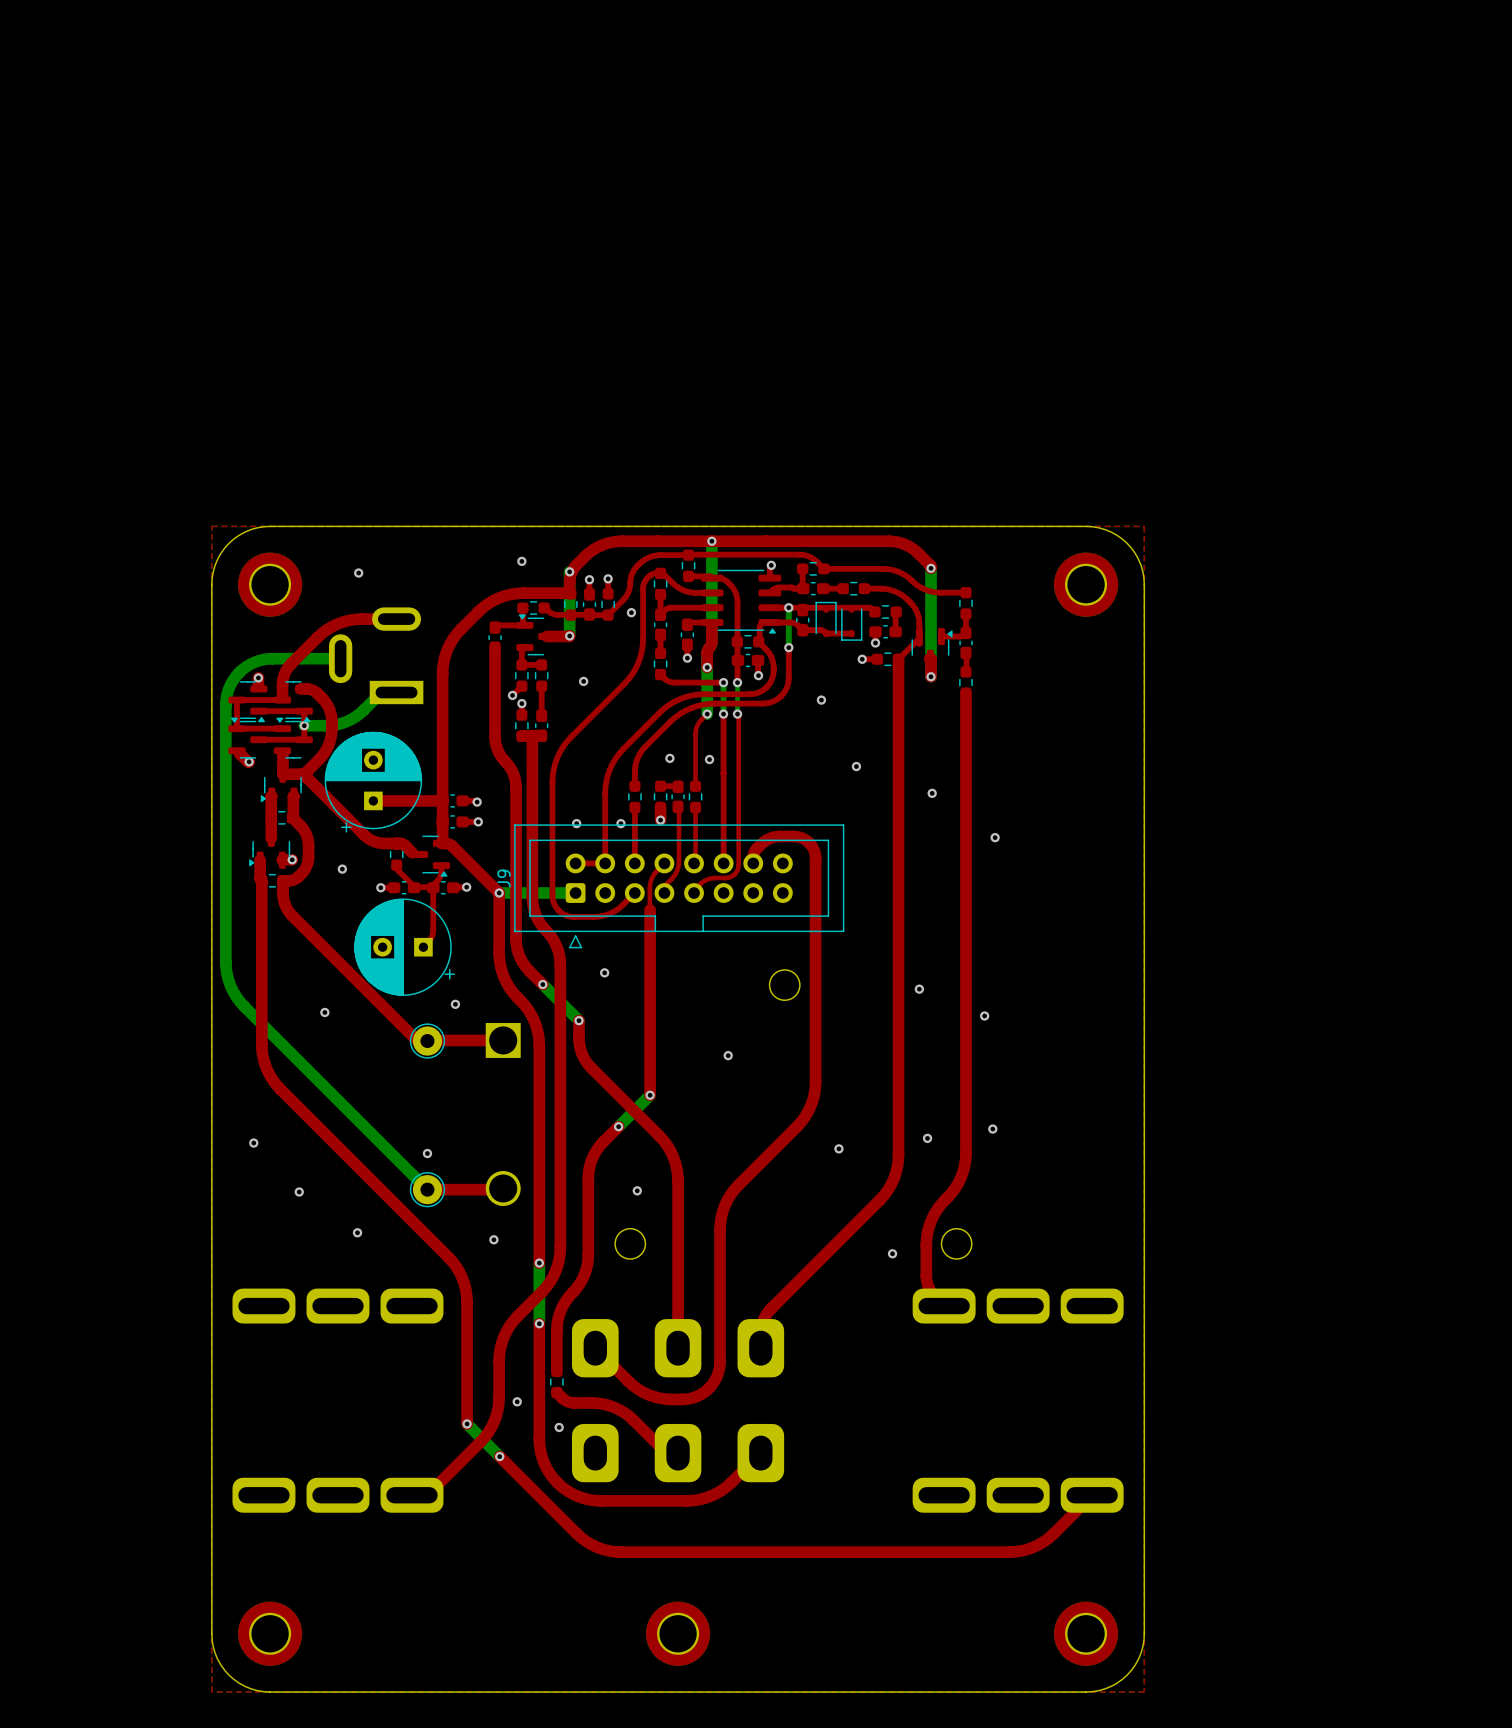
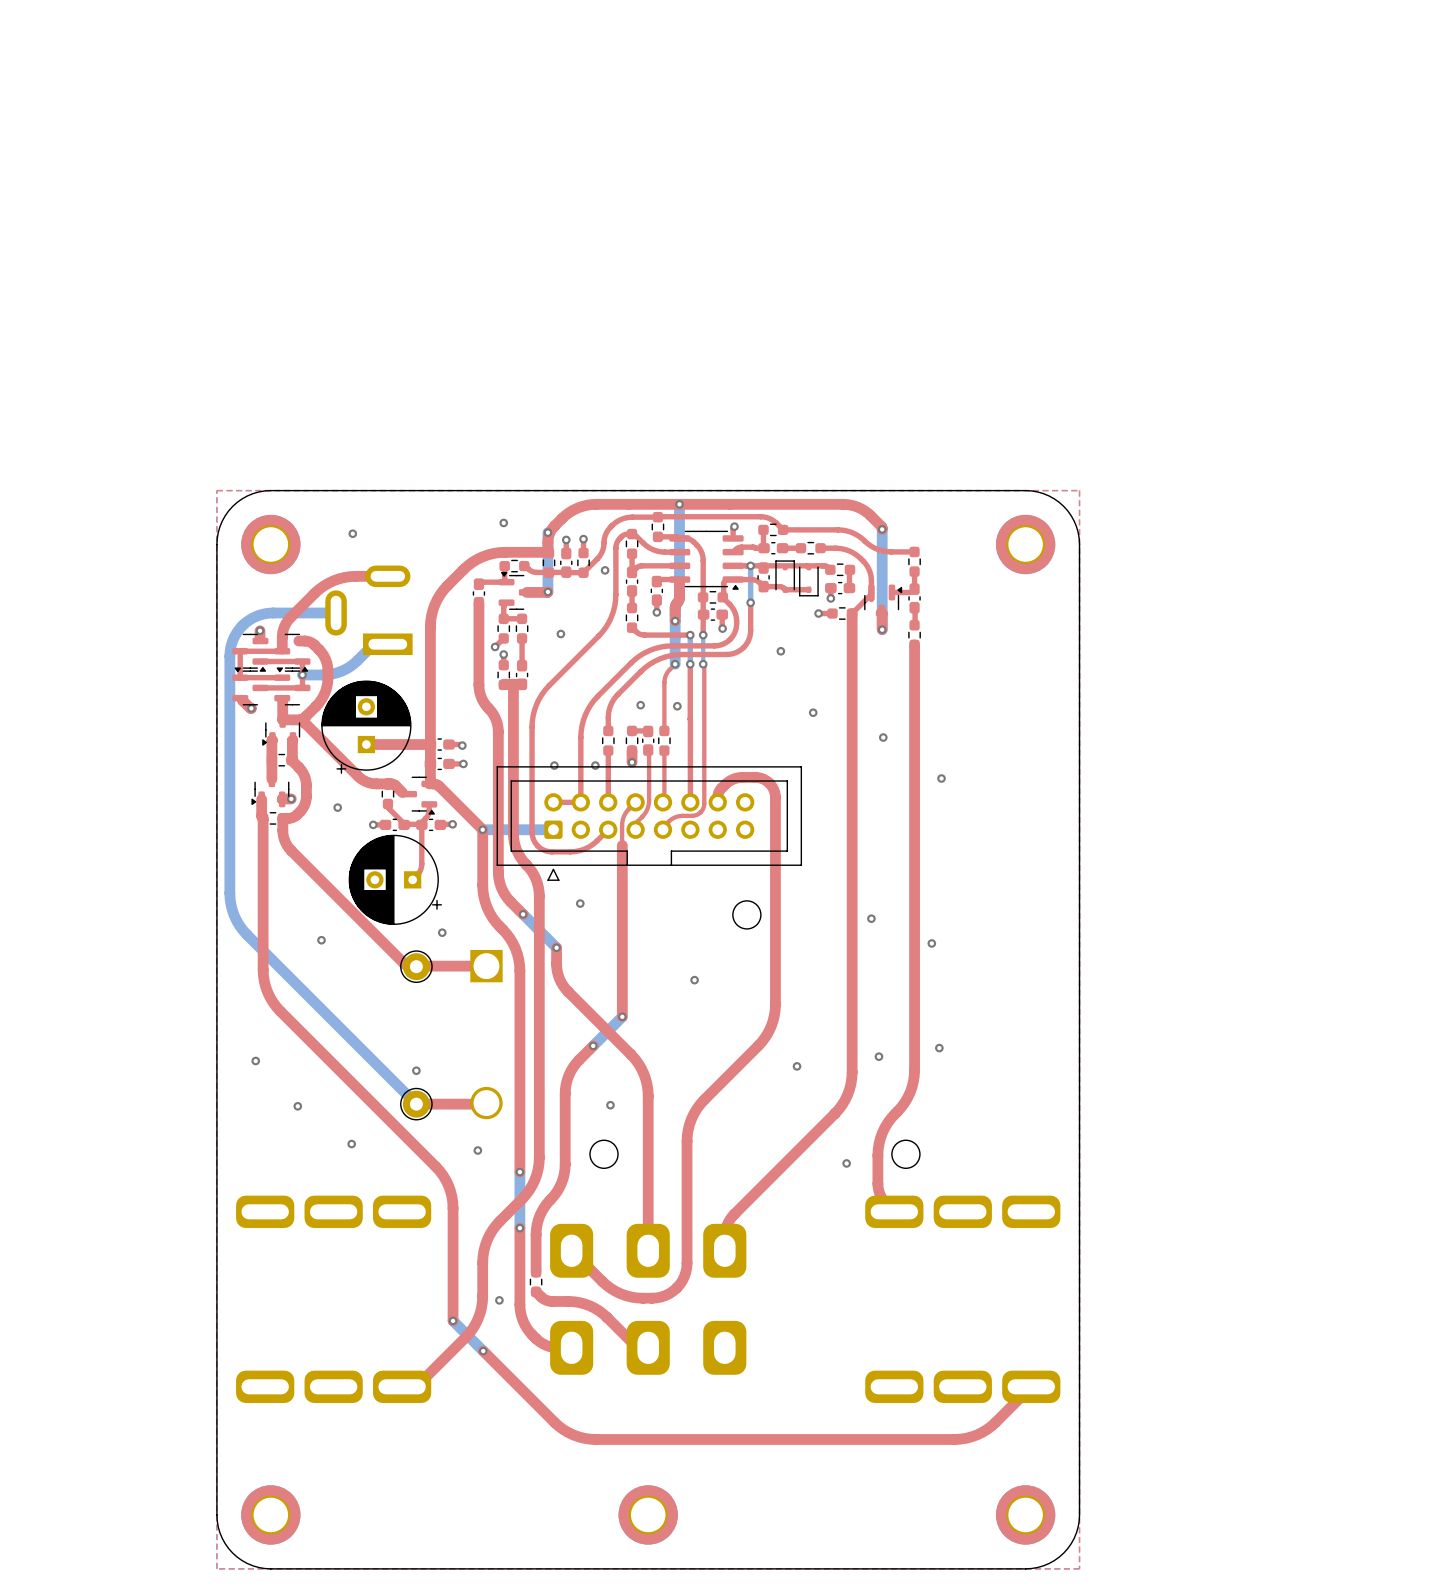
J9 name: J9 (504, 878) -> none
top track: (539, 1406) (539, 1445) (546, 1468) (553, 1478) (566, 1490) (589, 1499) (686, 1500) (705, 1498) (727, 1486) (760, 1453) -> (519, 1304) (525, 1325) (538, 1341) (550, 1346) (571, 1347)
via: (559, 1427) -> none

